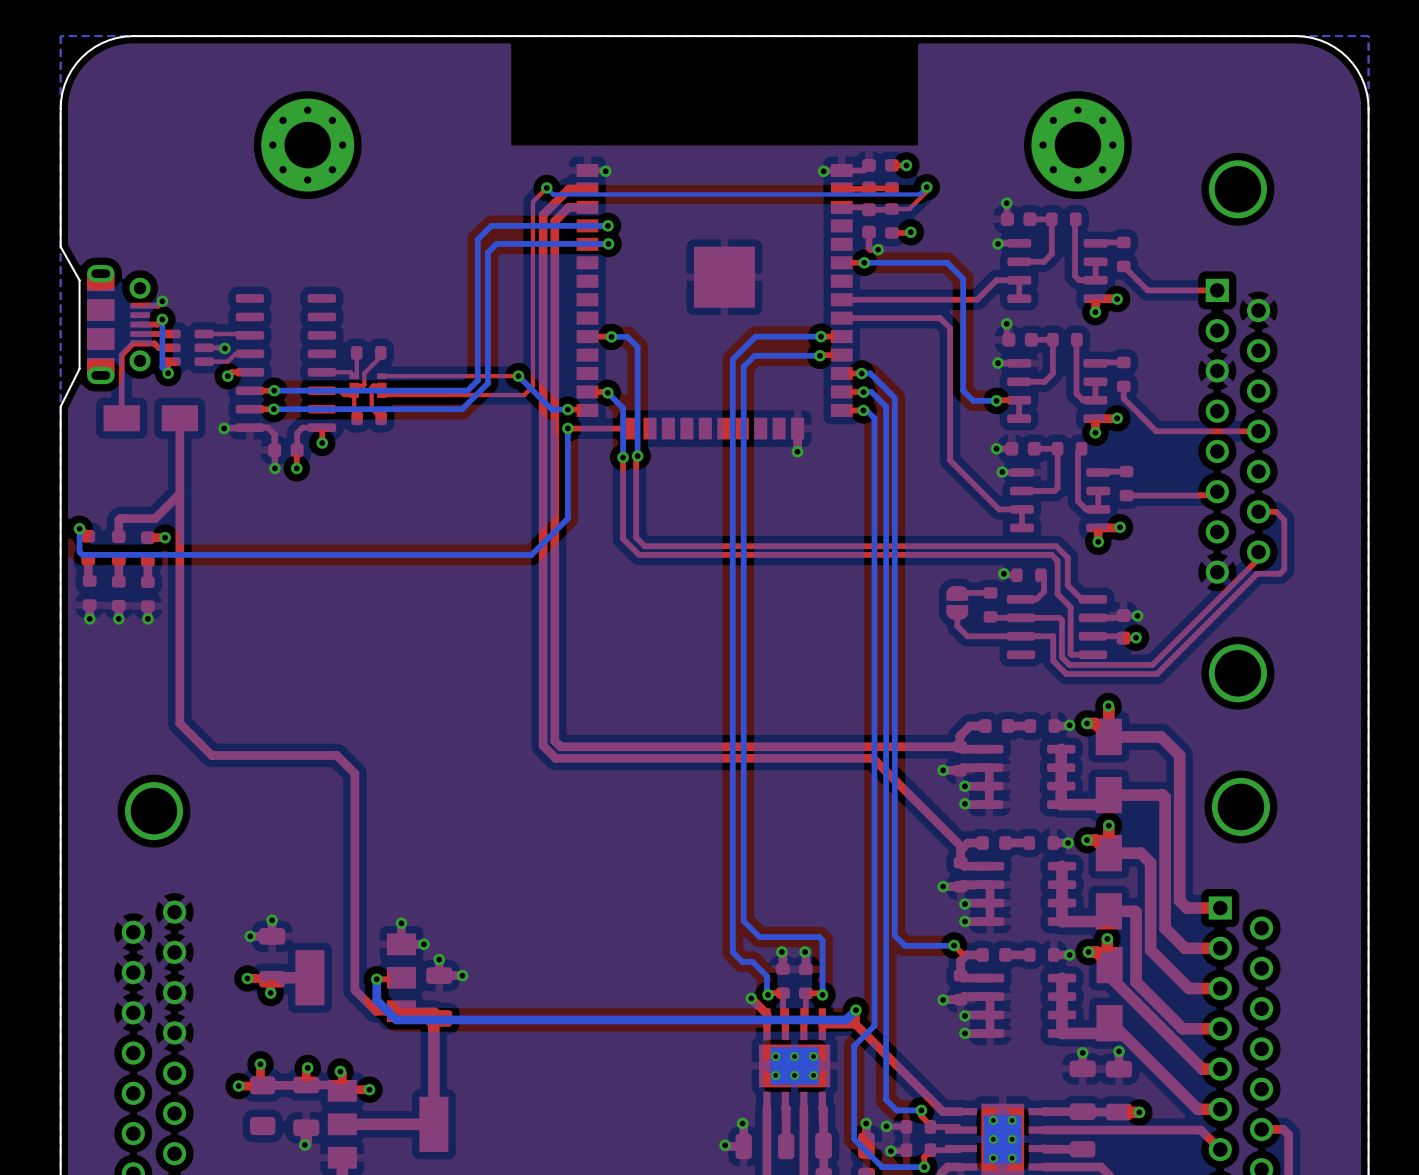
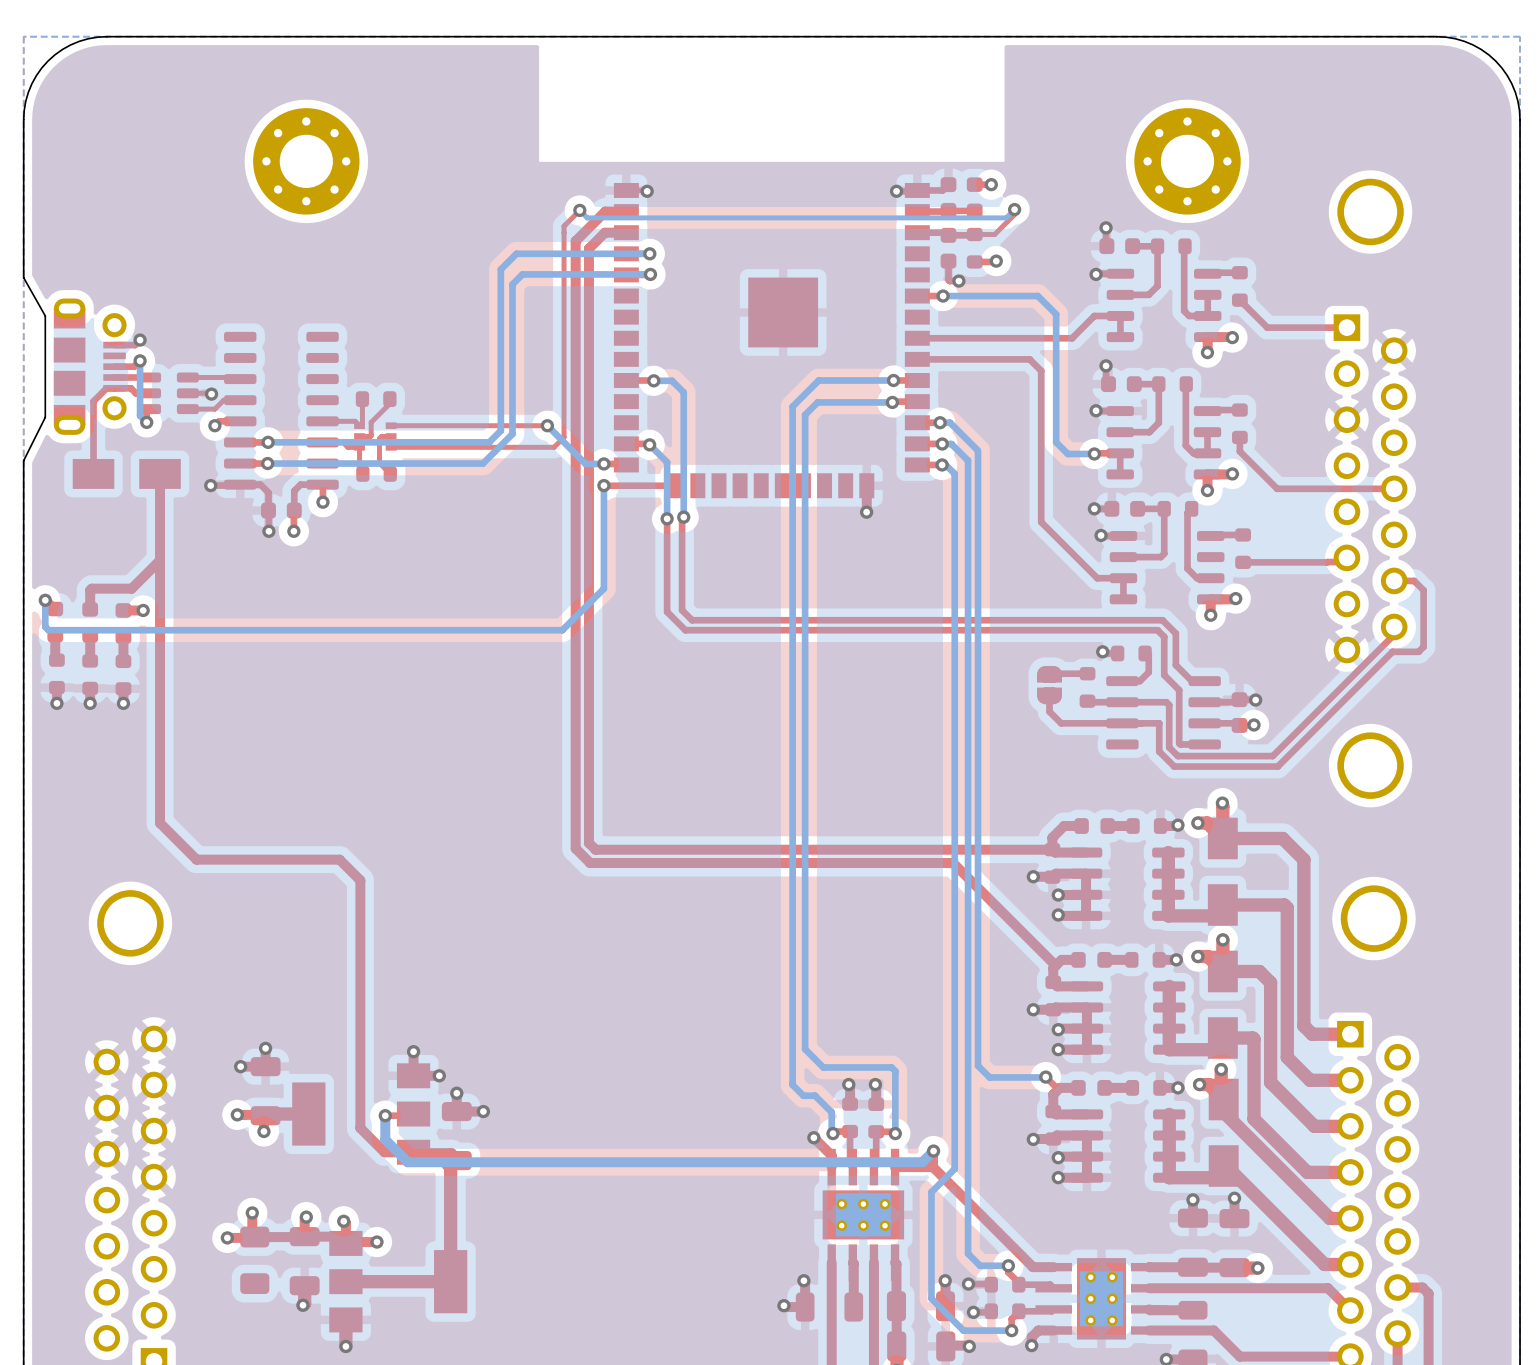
top track: (1098, 490) (1098, 509) -> none

